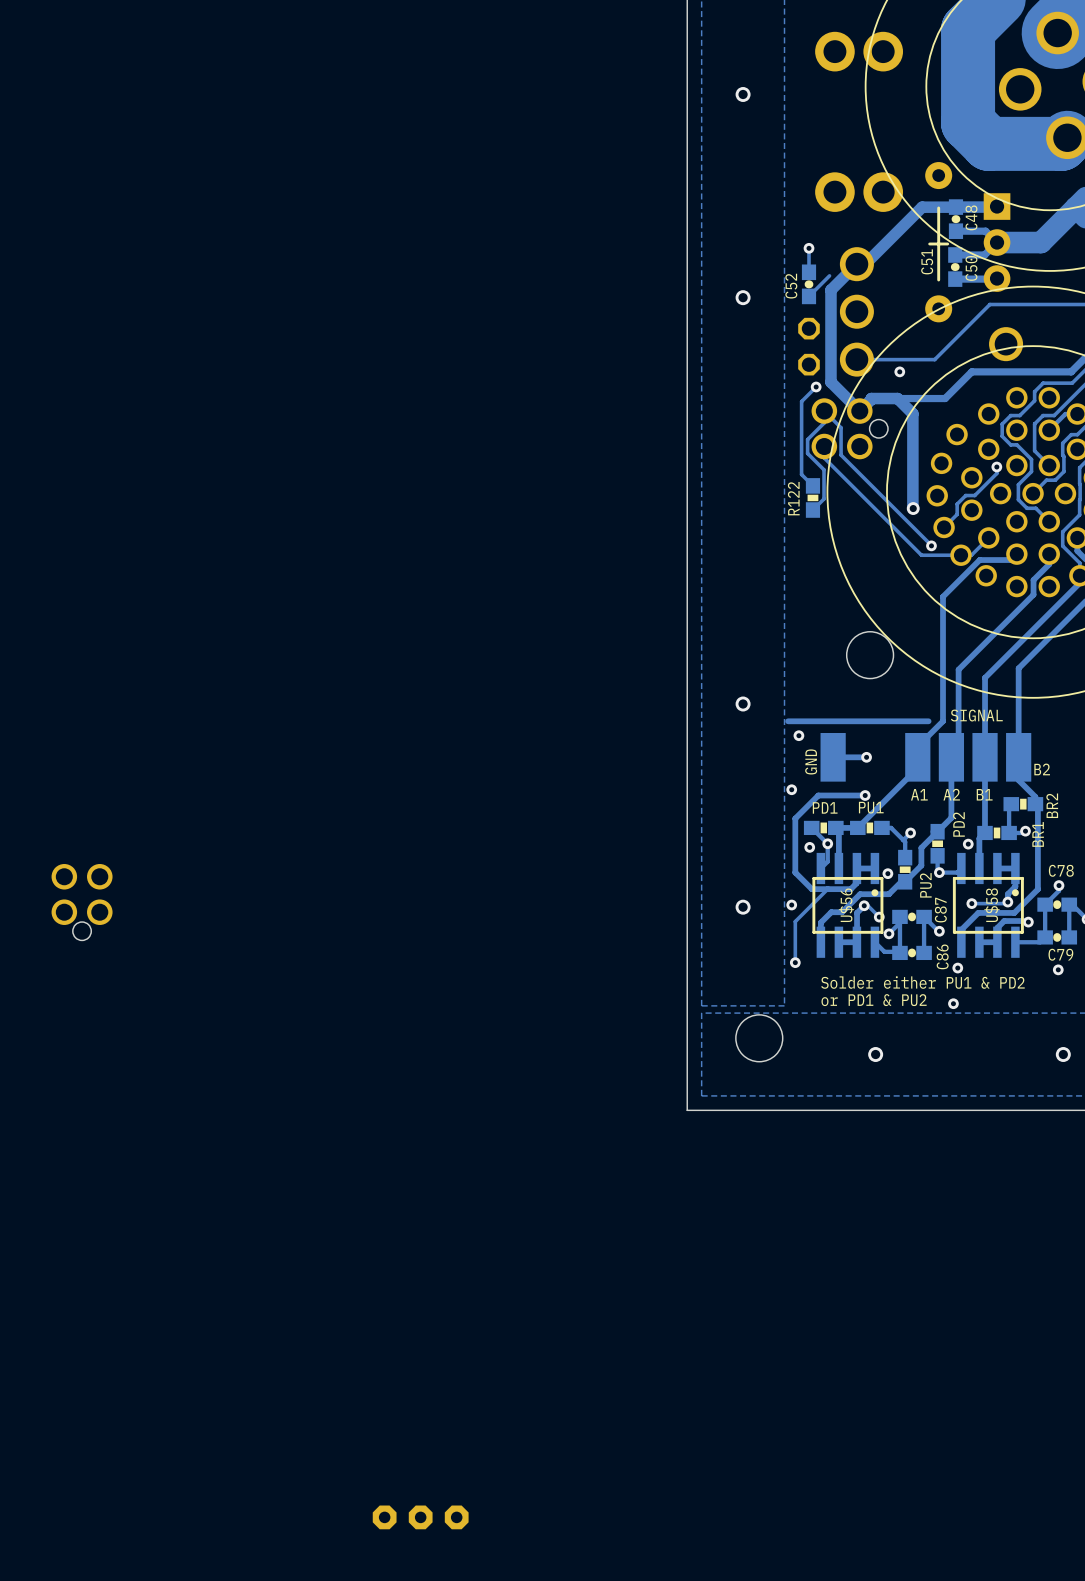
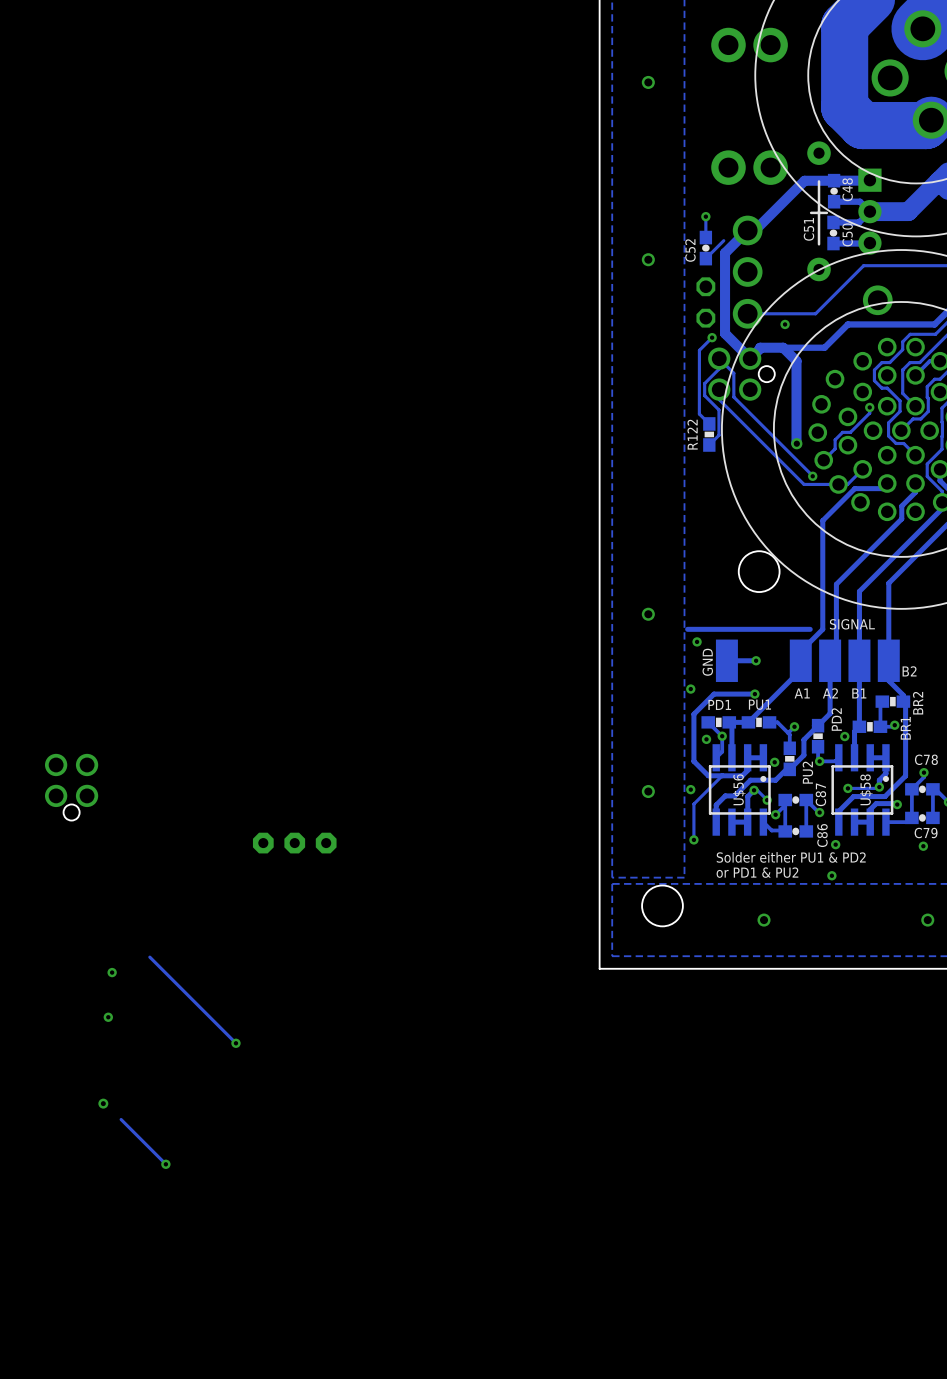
part: none -> (294, 843)
track: none -> (149, 957) (235, 1043)
via: none -> (112, 972)
via: none -> (108, 1017)
via: none -> (235, 1043)
via: none -> (103, 1103)
track: none -> (121, 1119) (165, 1164)
via: none -> (165, 1164)
part: (420, 1517) -> none

